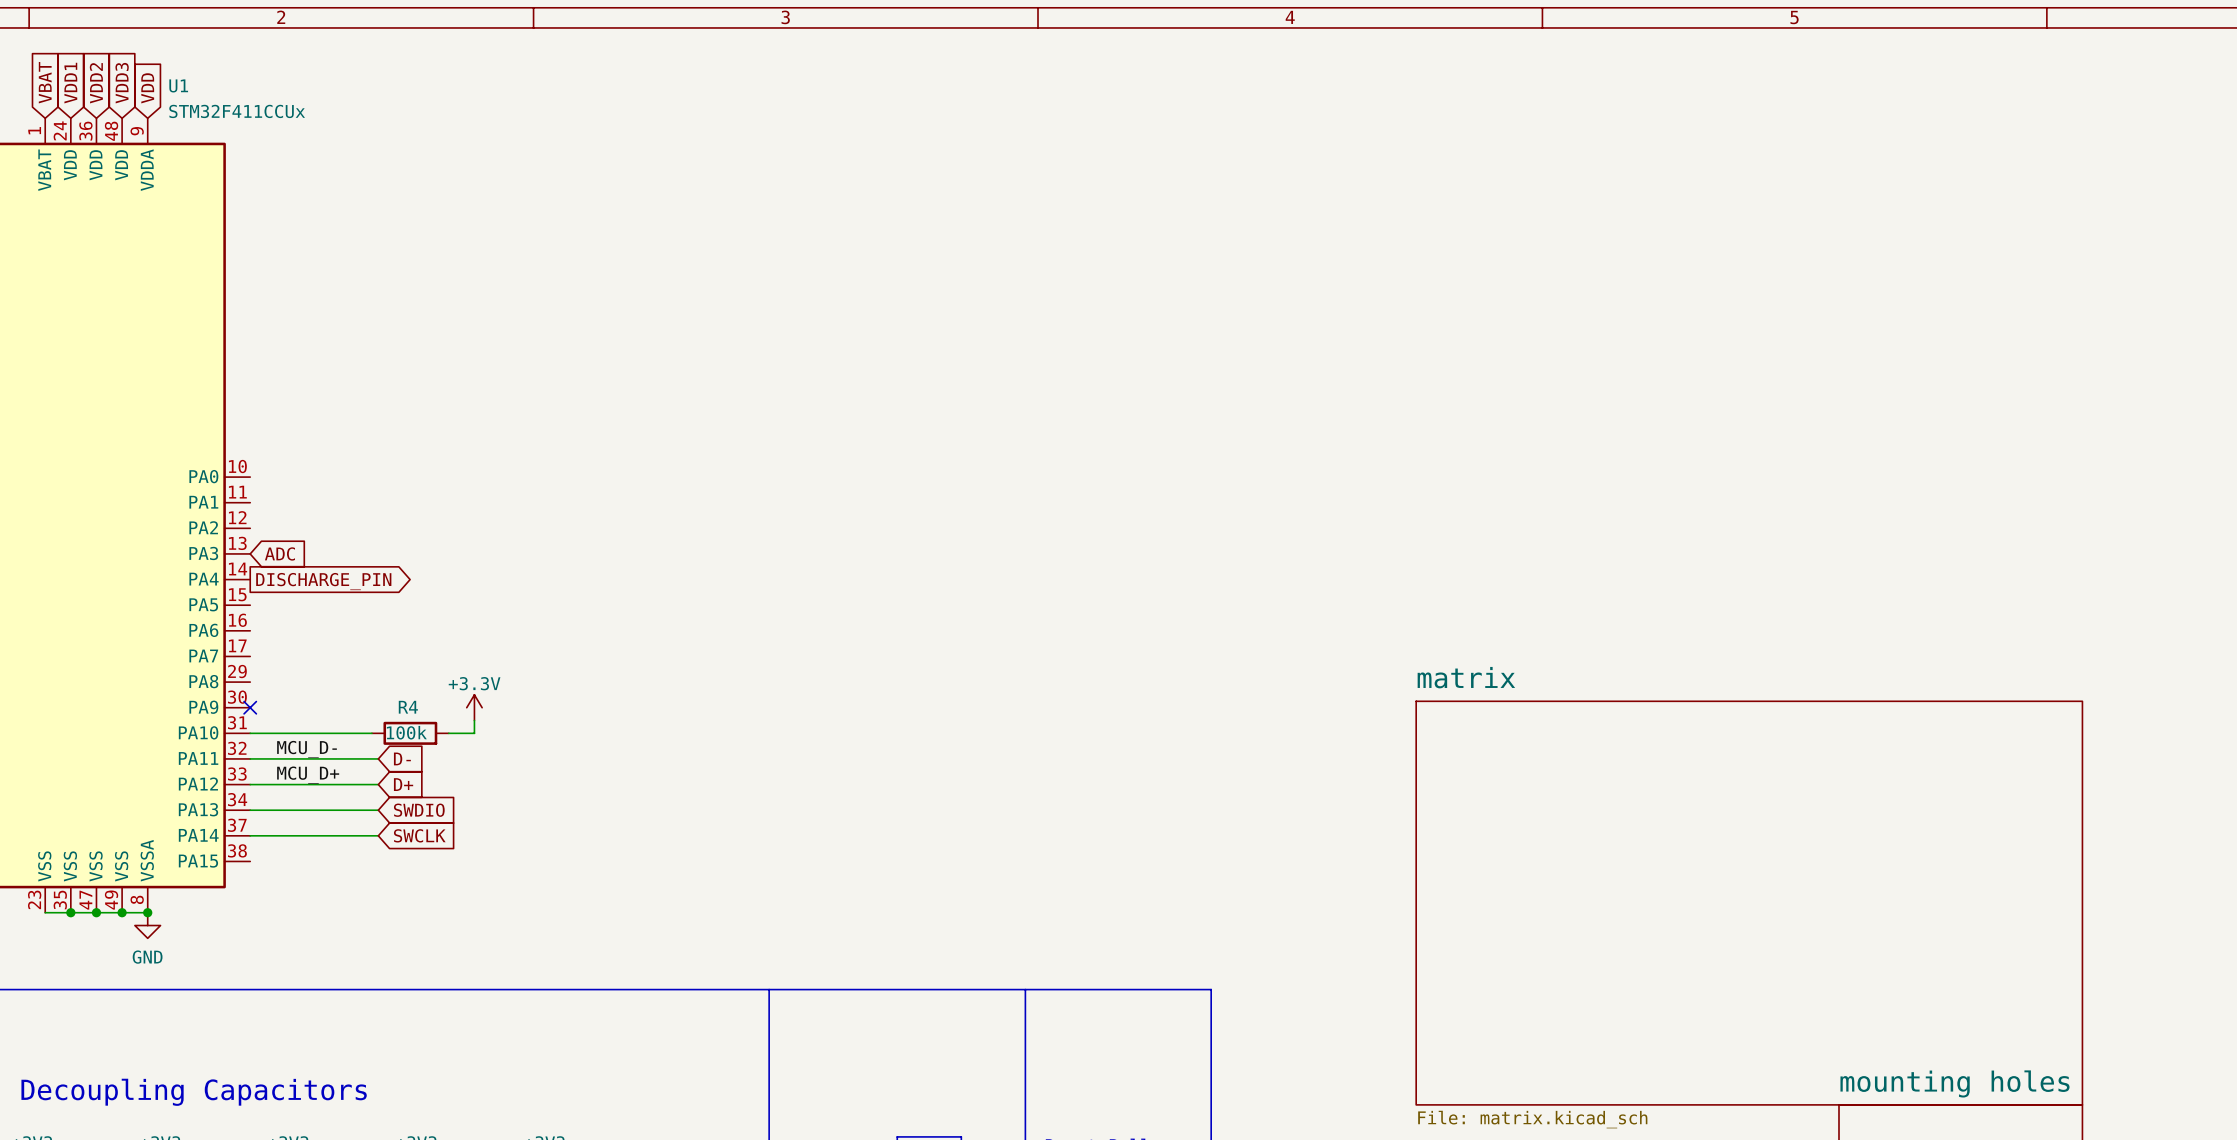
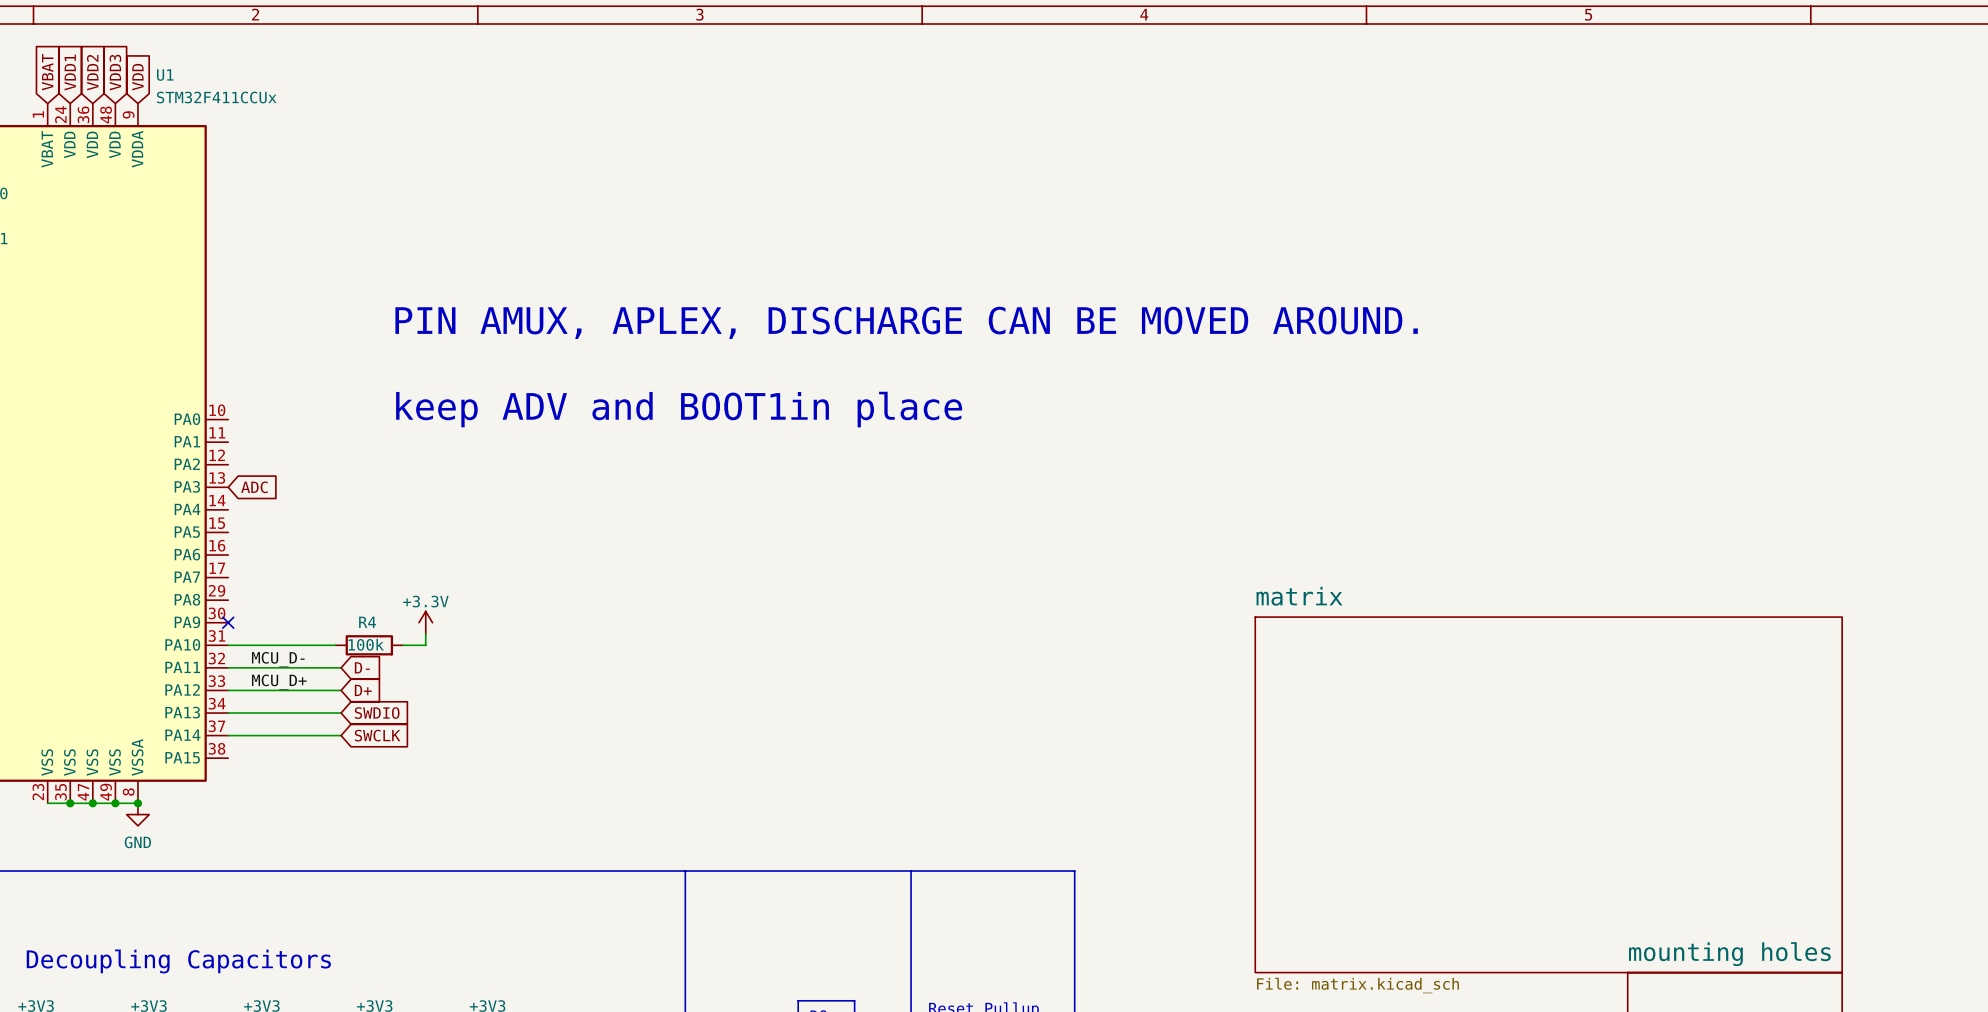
text: none -> PIN AMUX, APLEX, DISCHARGE CAN BE MOVED AROUND. (906, 322)
text: none -> keep ADV and BOOT1in place (679, 409)
global label: DISCHARGE_PIN (323, 581) -> none

